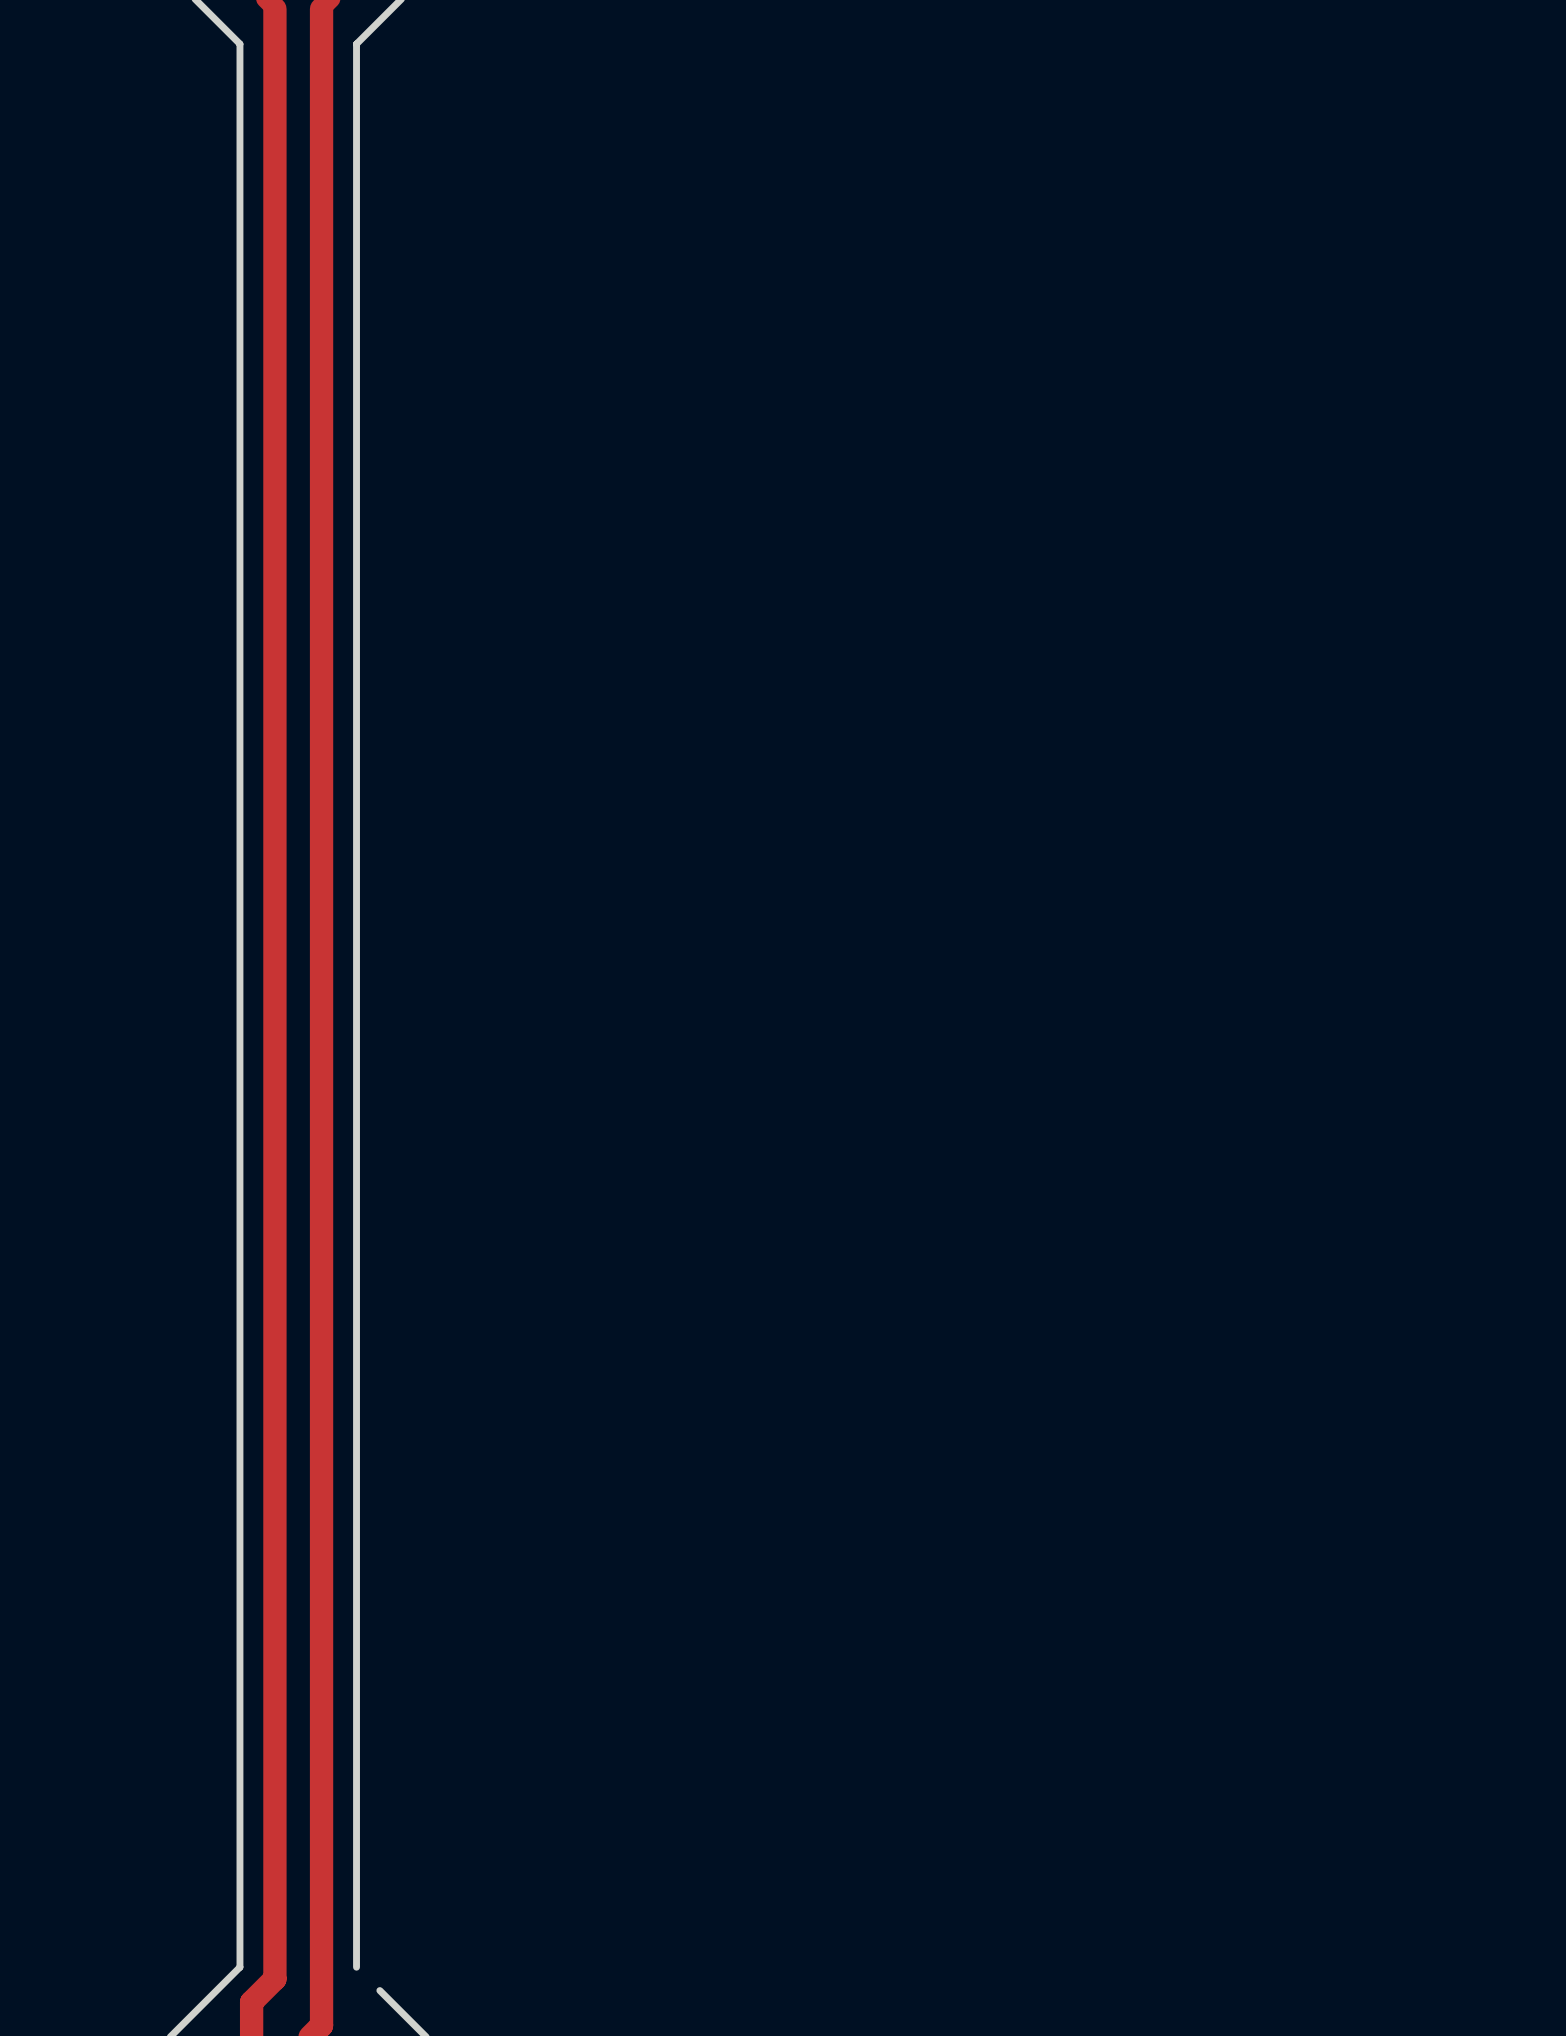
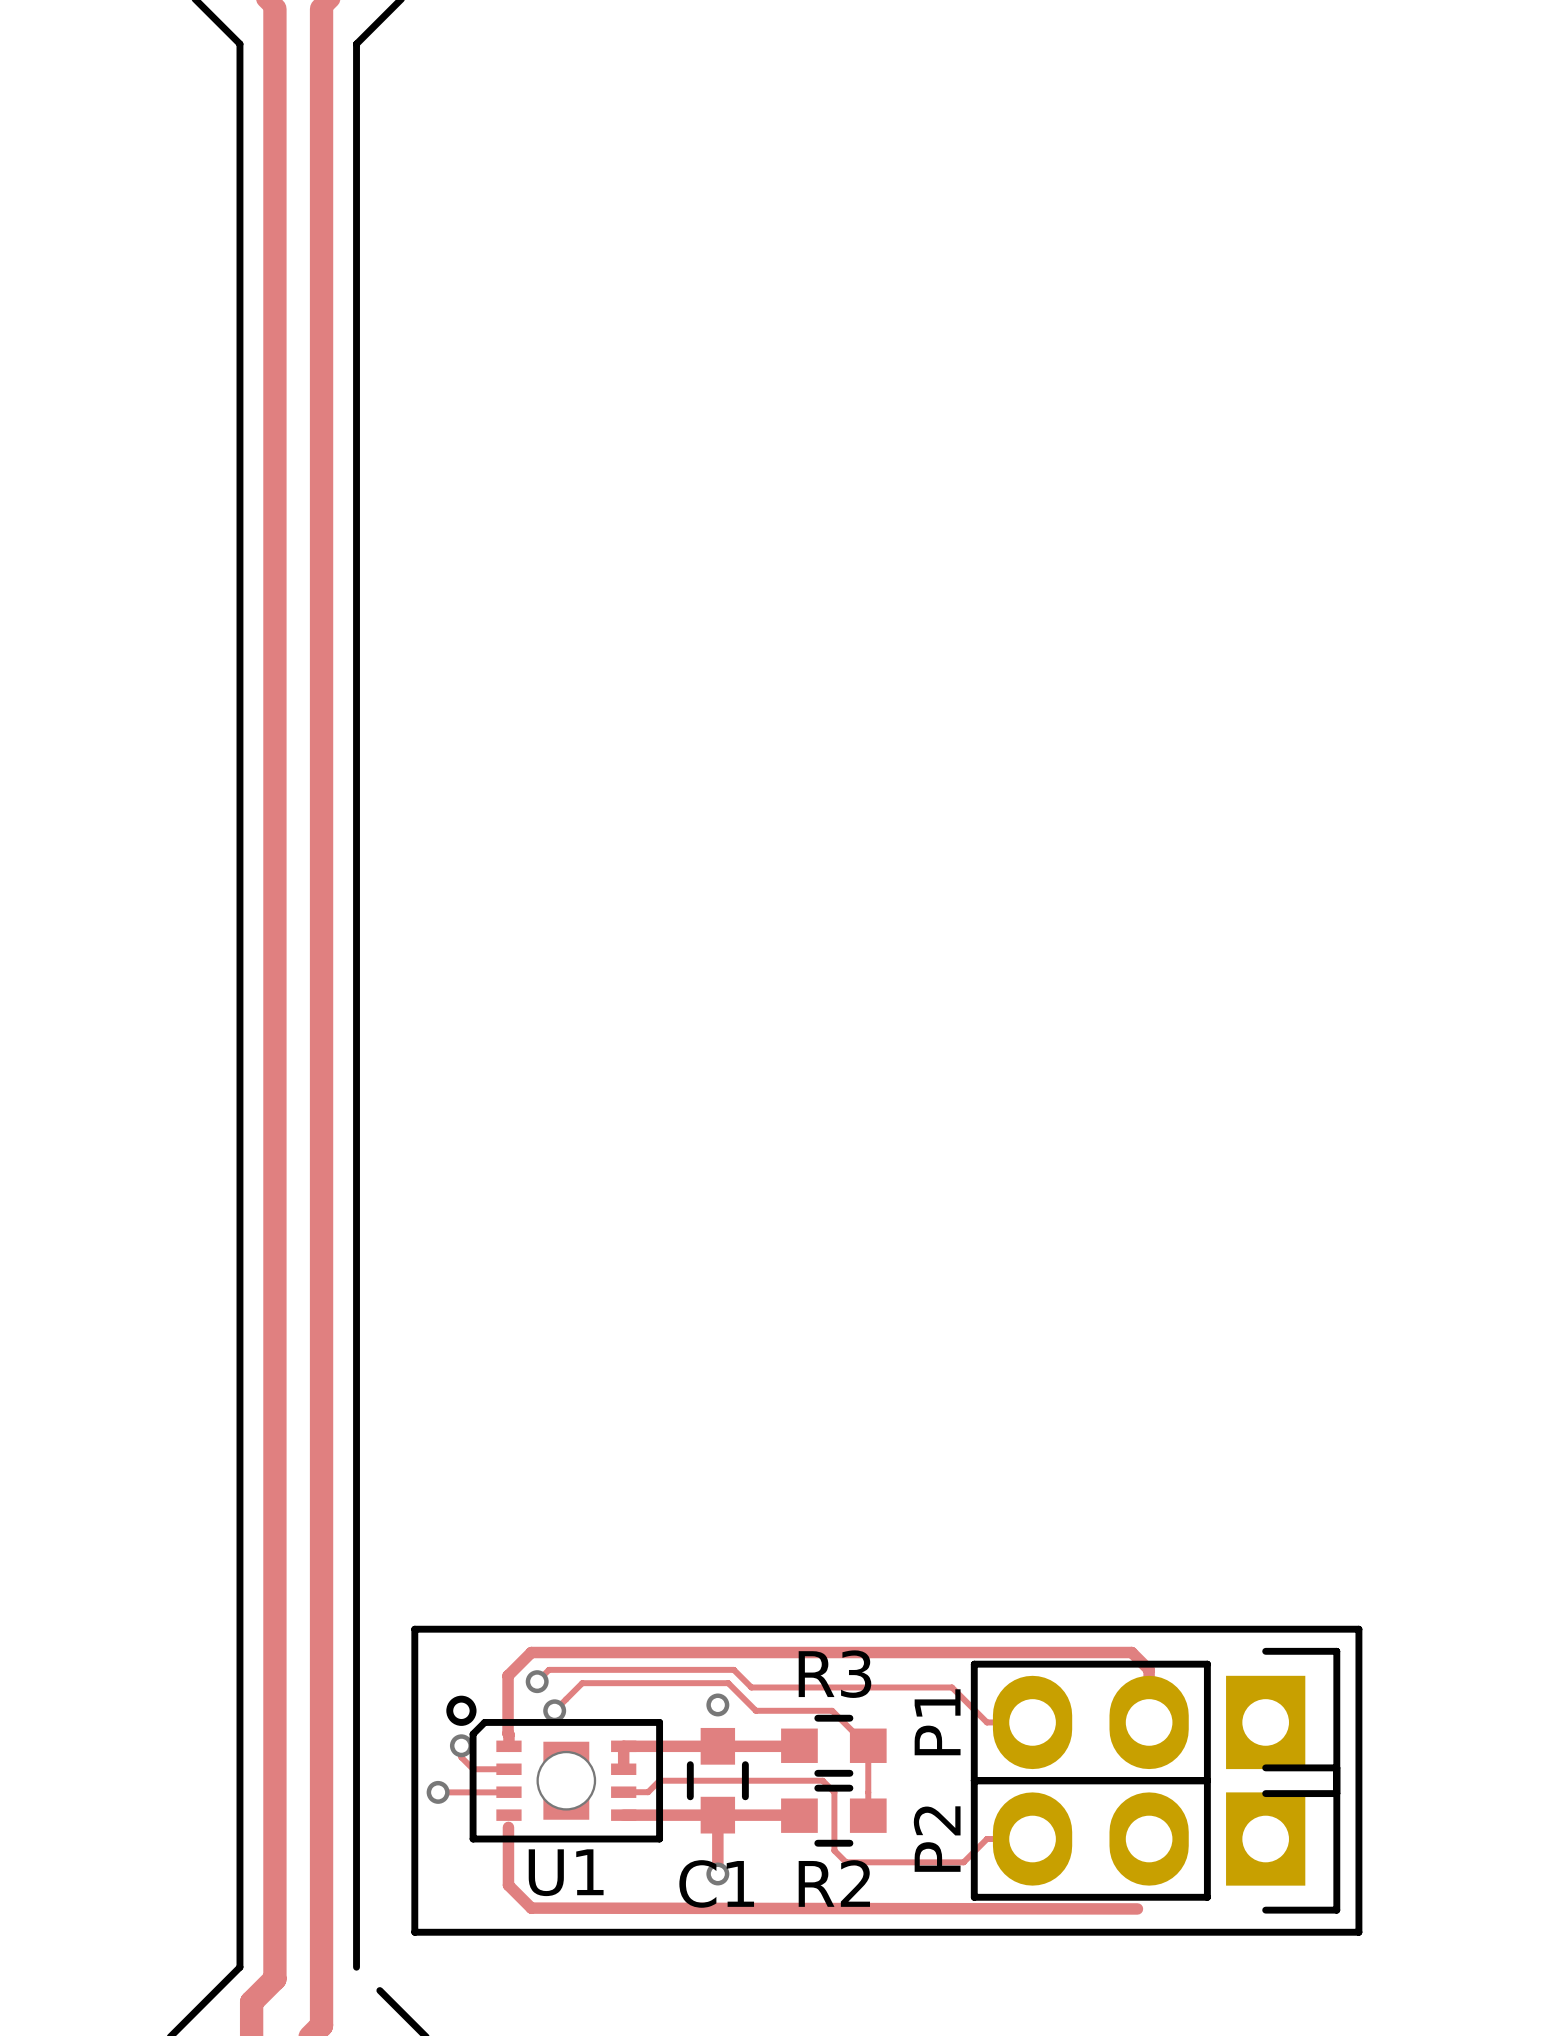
board edge: none -> (414, 1629) (1358, 1629) (1358, 1932) (414, 1932) (414, 1629)
track: none -> (537, 1681) (548, 1669) (733, 1669) (751, 1687) (951, 1687) (986, 1722) (1032, 1722)
via: none -> (537, 1681)
via: none -> (717, 1704)
track: none -> (554, 1710) (582, 1683) (728, 1683) (755, 1710) (832, 1710) (868, 1745) (868, 1815)
via: none -> (554, 1710)
track: none -> (1149, 1722) (1149, 1669) (1131, 1652) (531, 1652) (508, 1675) (508, 1746)
P1: none -> (1155, 1722)
track: none -> (461, 1745) (461, 1757) (473, 1769) (508, 1769)
via: none -> (461, 1745)
R3: none -> (833, 1745)
track: none -> (798, 1746) (623, 1746) (623, 1769)
U1: none -> (554, 1769)
via: none -> (566, 1780)
C1: none -> (717, 1780)
track: none -> (438, 1792) (508, 1792)
via: none -> (438, 1792)
track: none -> (623, 1792) (648, 1792) (659, 1780) (822, 1780) (834, 1792) (834, 1850) (846, 1862) (963, 1862) (986, 1839) (1032, 1839)
track: none -> (623, 1815) (798, 1815)
track: none -> (717, 1815) (717, 1873)
R2: none -> (833, 1815)
track: none -> (508, 1827) (508, 1885) (531, 1908) (1136, 1908)
P2: none -> (1155, 1839)
via: none -> (717, 1873)

